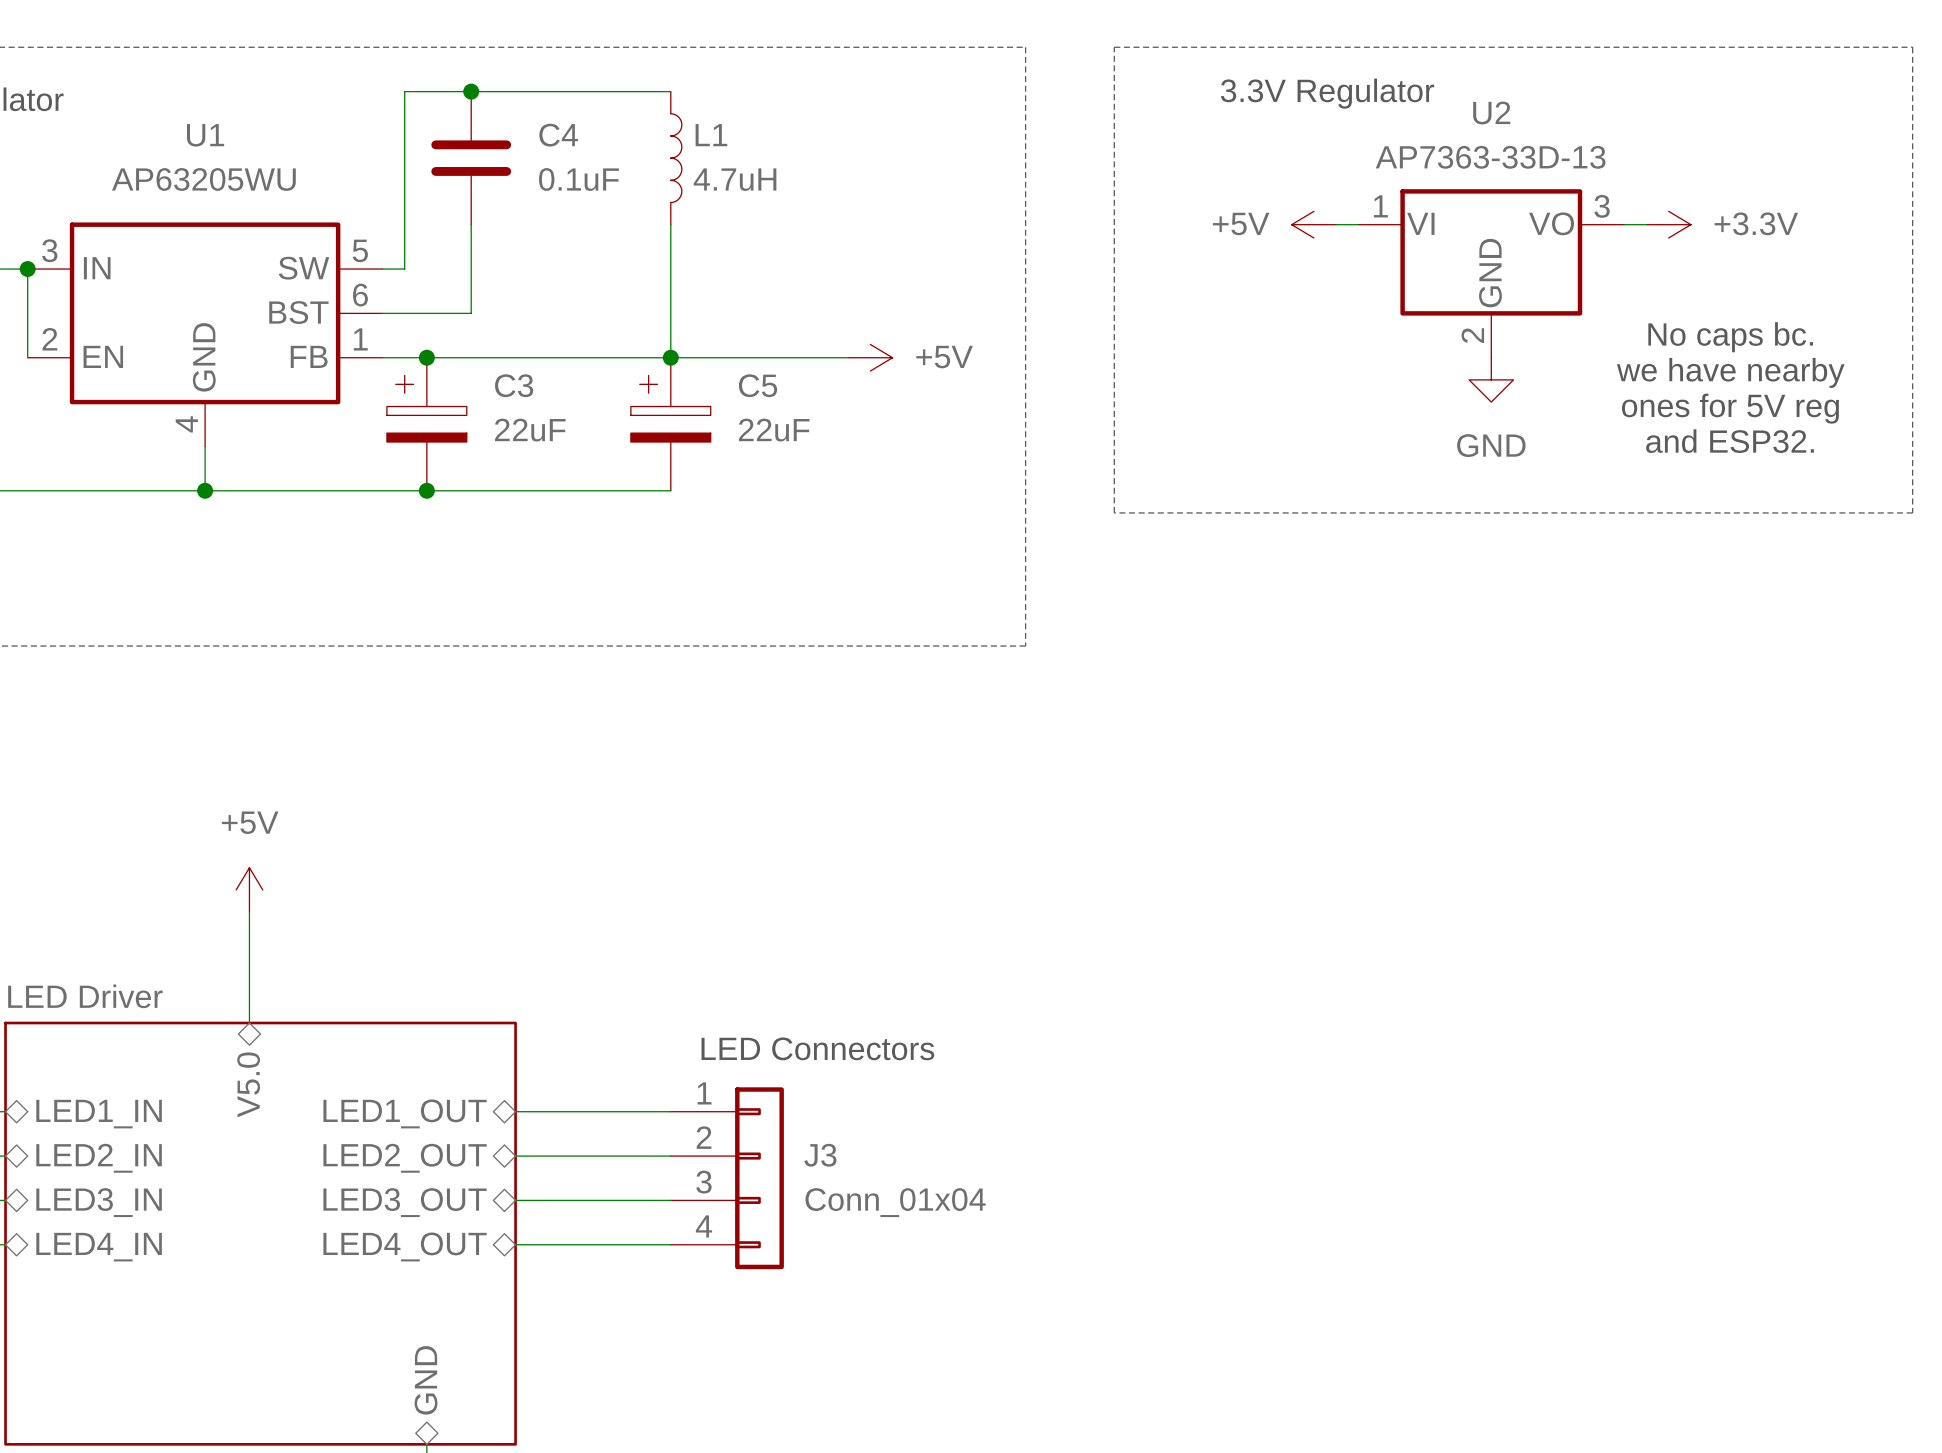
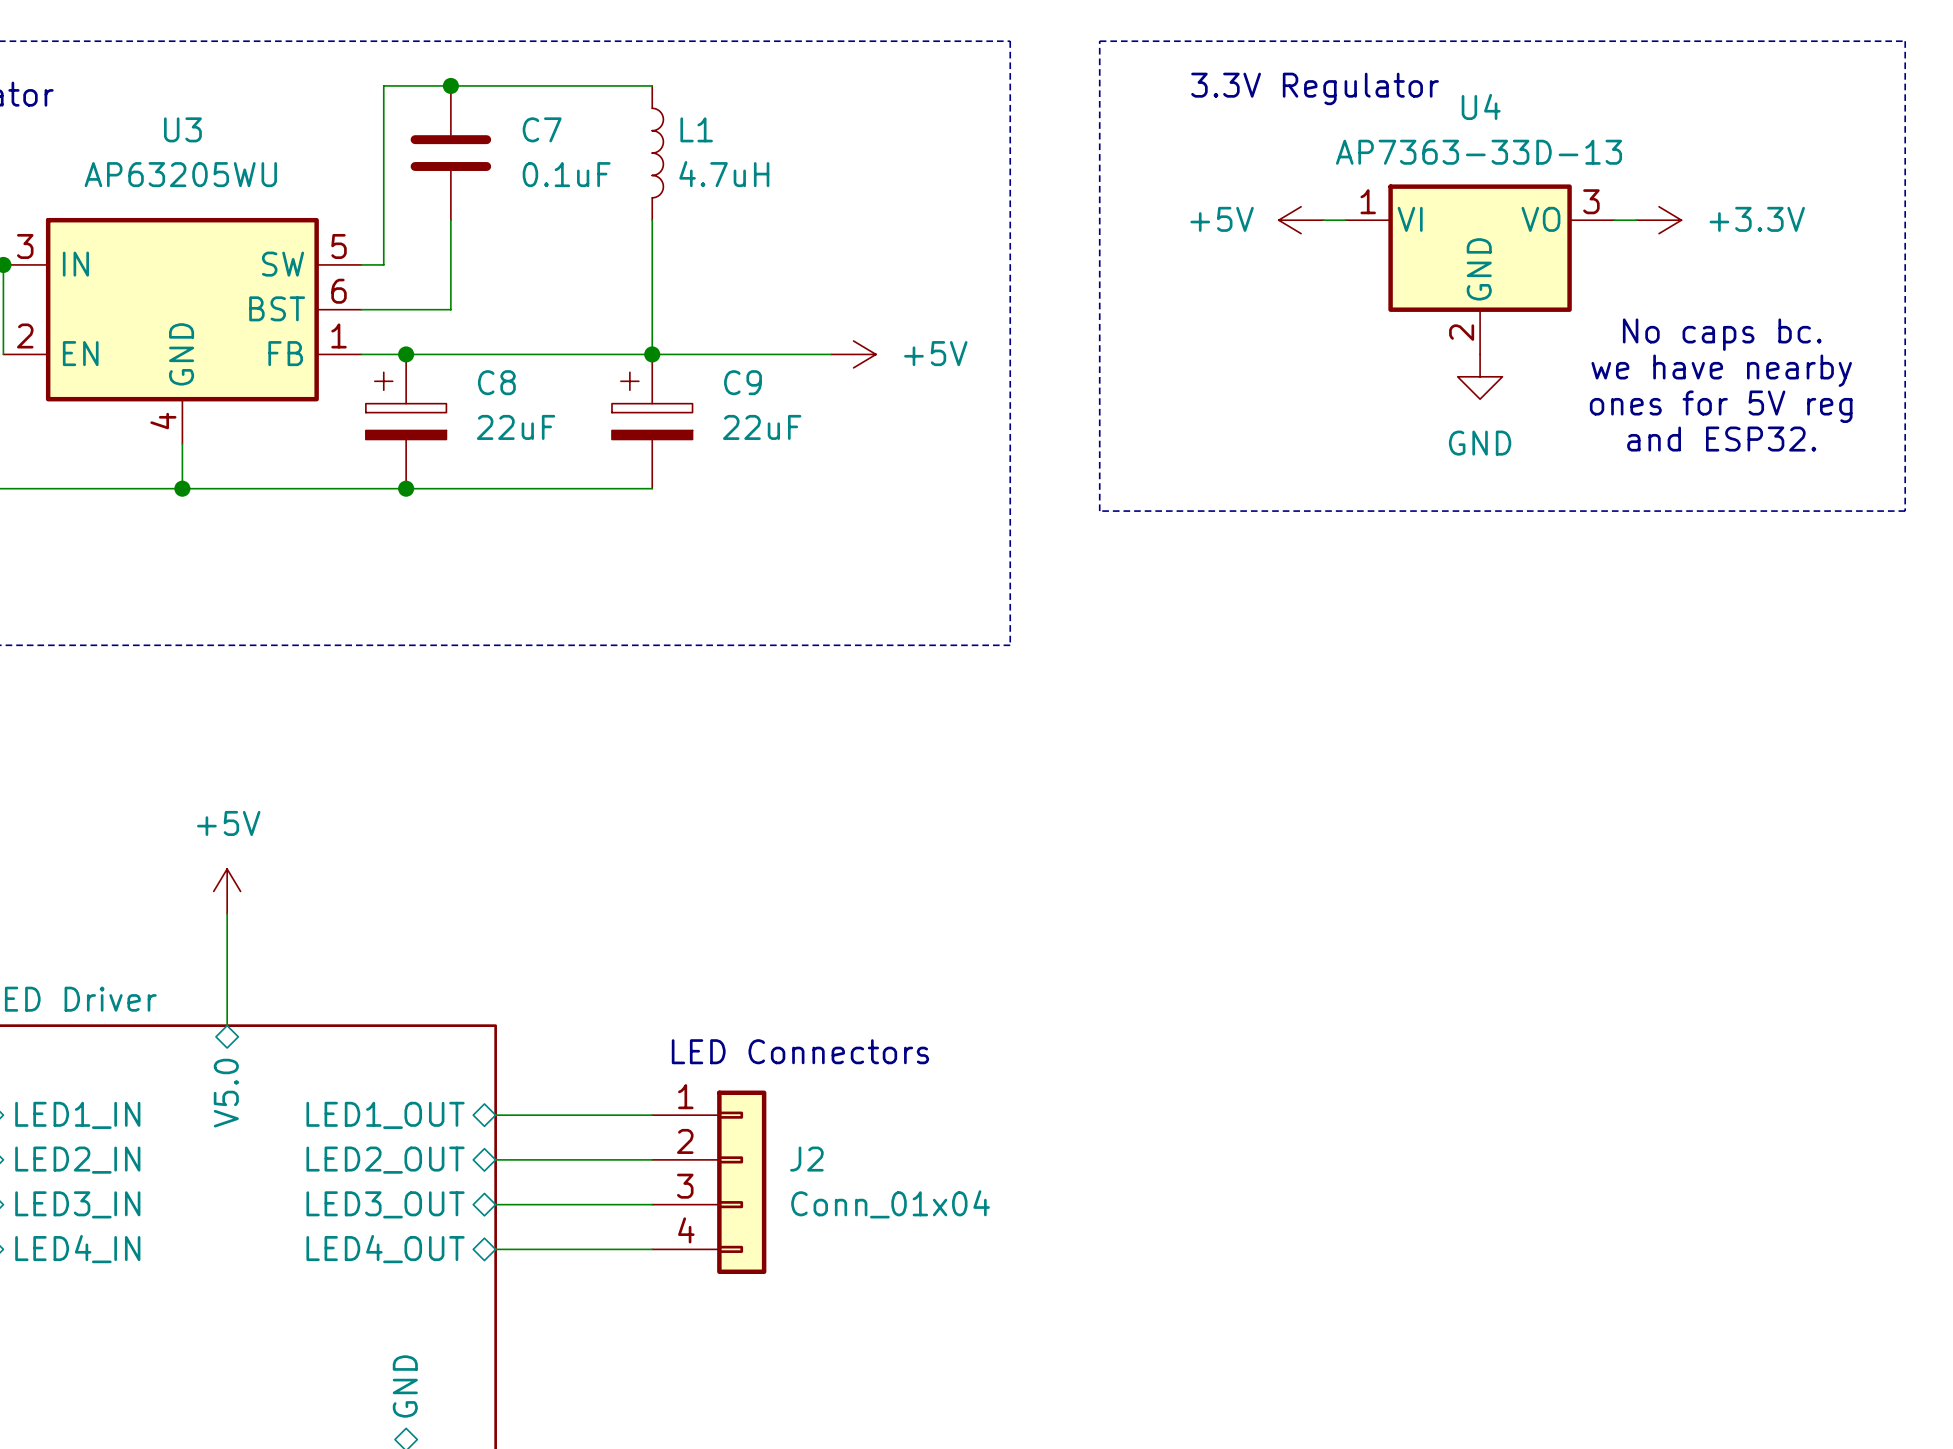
U2 name: U2 (1491, 112) -> U4 (1481, 106)
U1 name: U1 (205, 135) -> U3 (182, 129)
C4 name: C4 (558, 135) -> C7 (542, 129)
C3 name: C3 (514, 385) -> C8 (496, 382)
C5 name: C5 (758, 385) -> C9 (742, 382)
J3 name: J3 (820, 1155) -> J2 (806, 1159)

